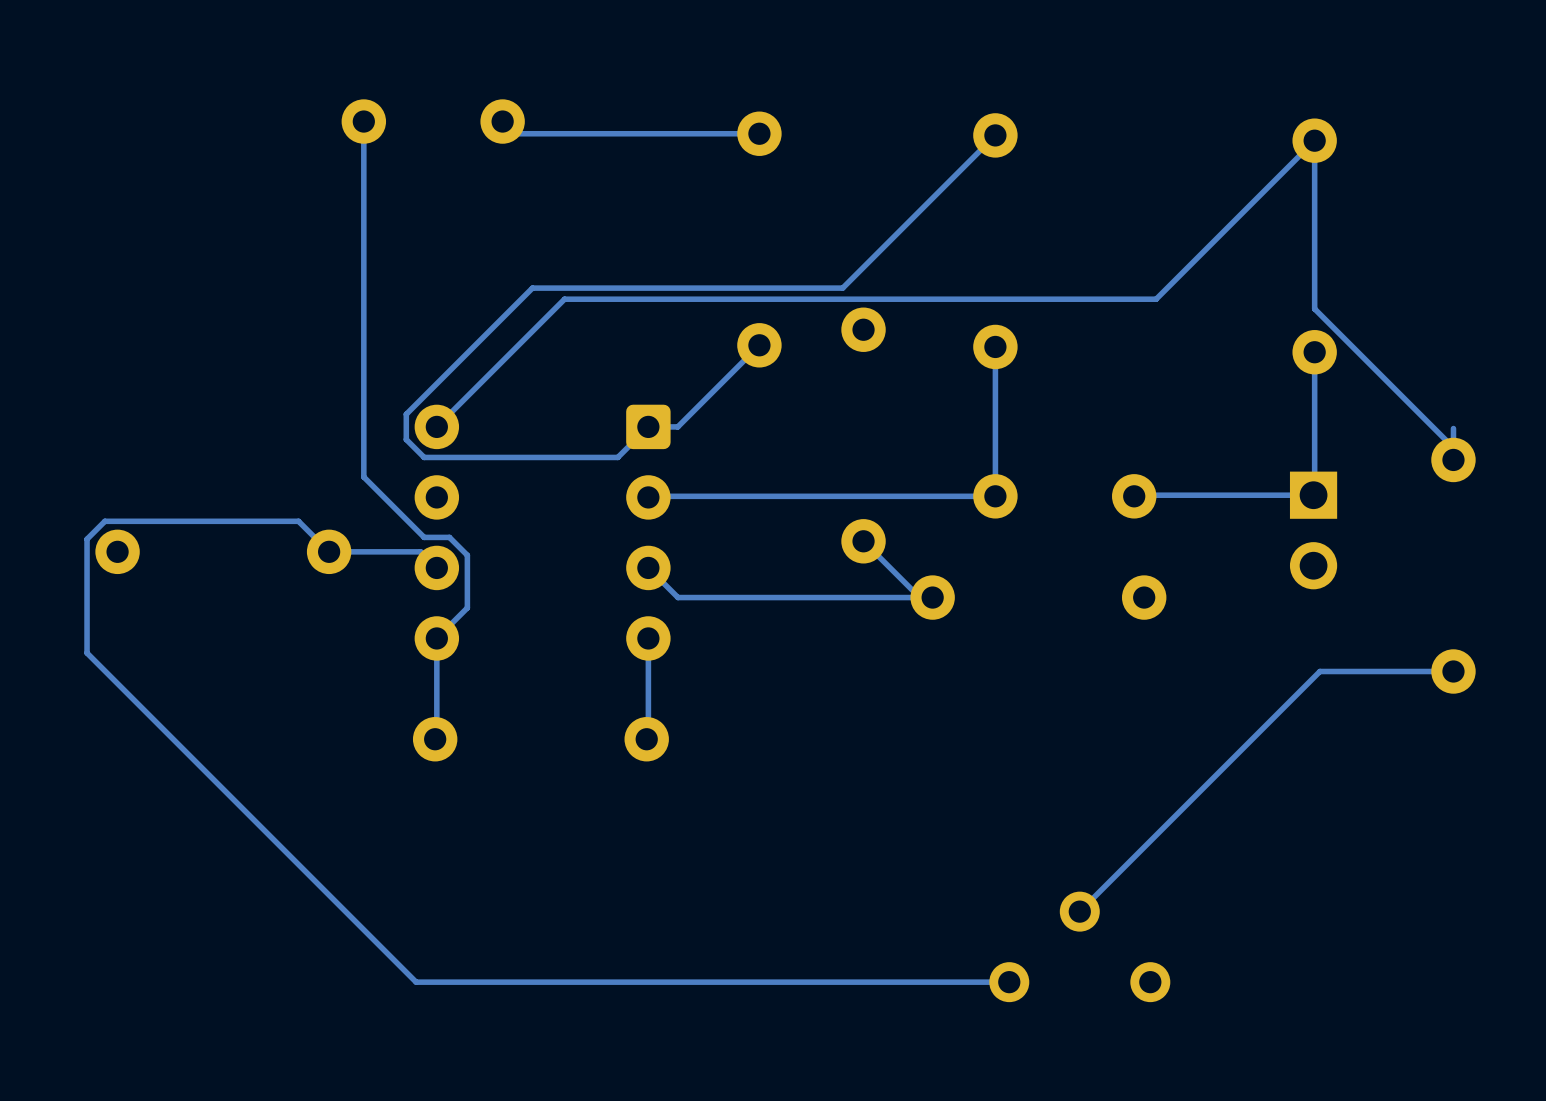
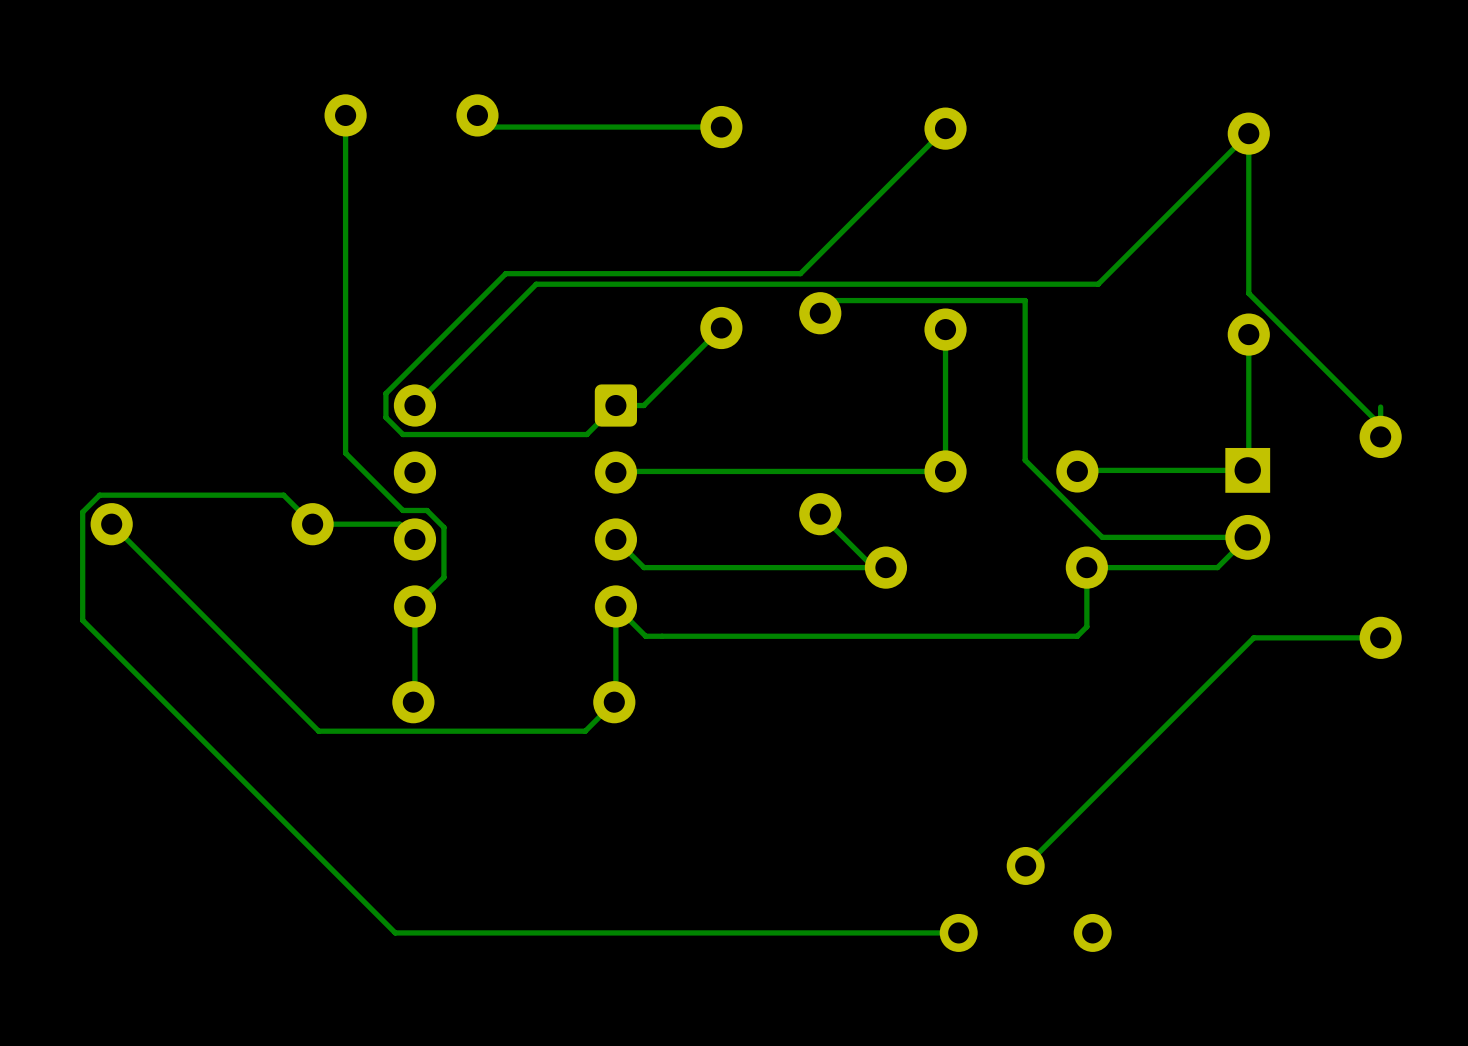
track: none -> (820, 313) (832, 300) (1025, 300) (1025, 460) (1102, 537) (1247, 537) (1217, 567) (1086, 567) (1086, 626) (1077, 636) (645, 636) (615, 606)
track: none -> (111, 524) (318, 731) (585, 731) (614, 702)

